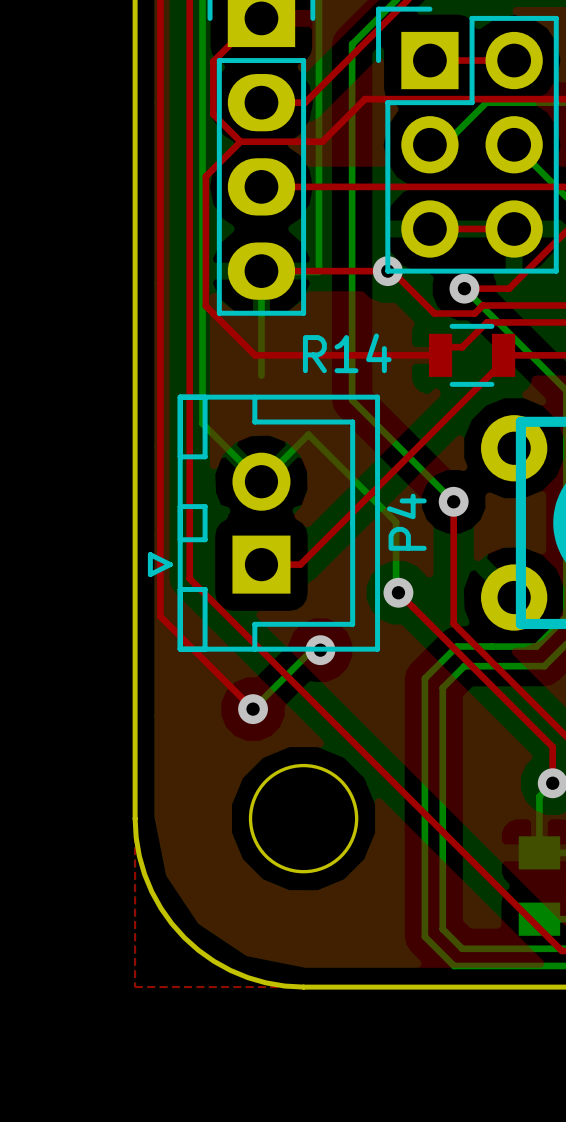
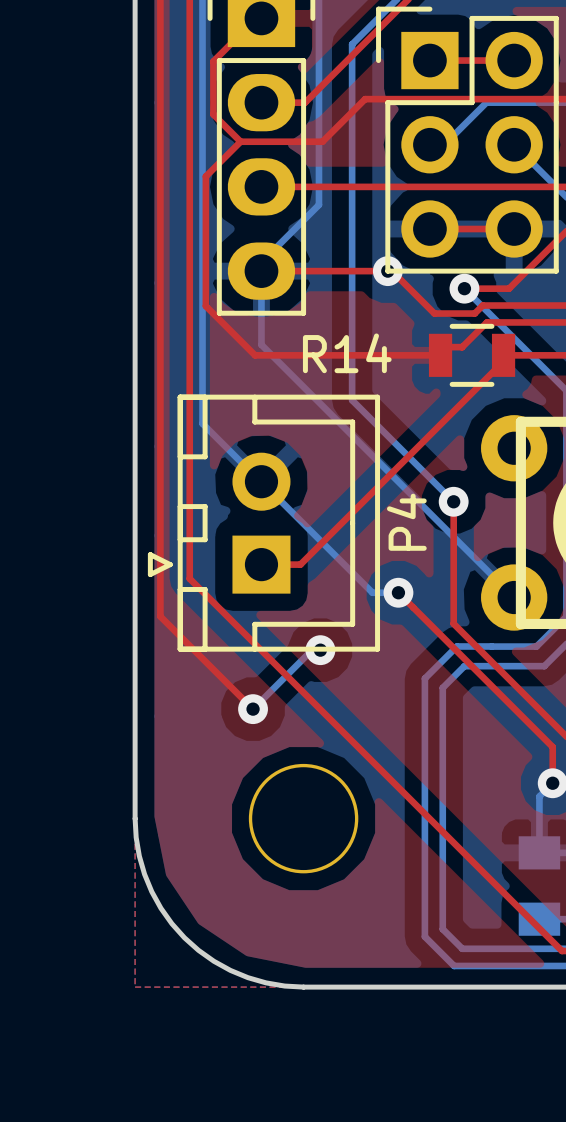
bottom track: (318, 204) (318, 271) (261, 271) -> (318, 204) (275, 248) (275, 256) (261, 271)
bottom track: (261, 344) (261, 375) -> (261, 344) (514, 597)
bottom track: (261, 481) (308, 434) (396, 522) (396, 592) -> (261, 481) (372, 592) (396, 592)

